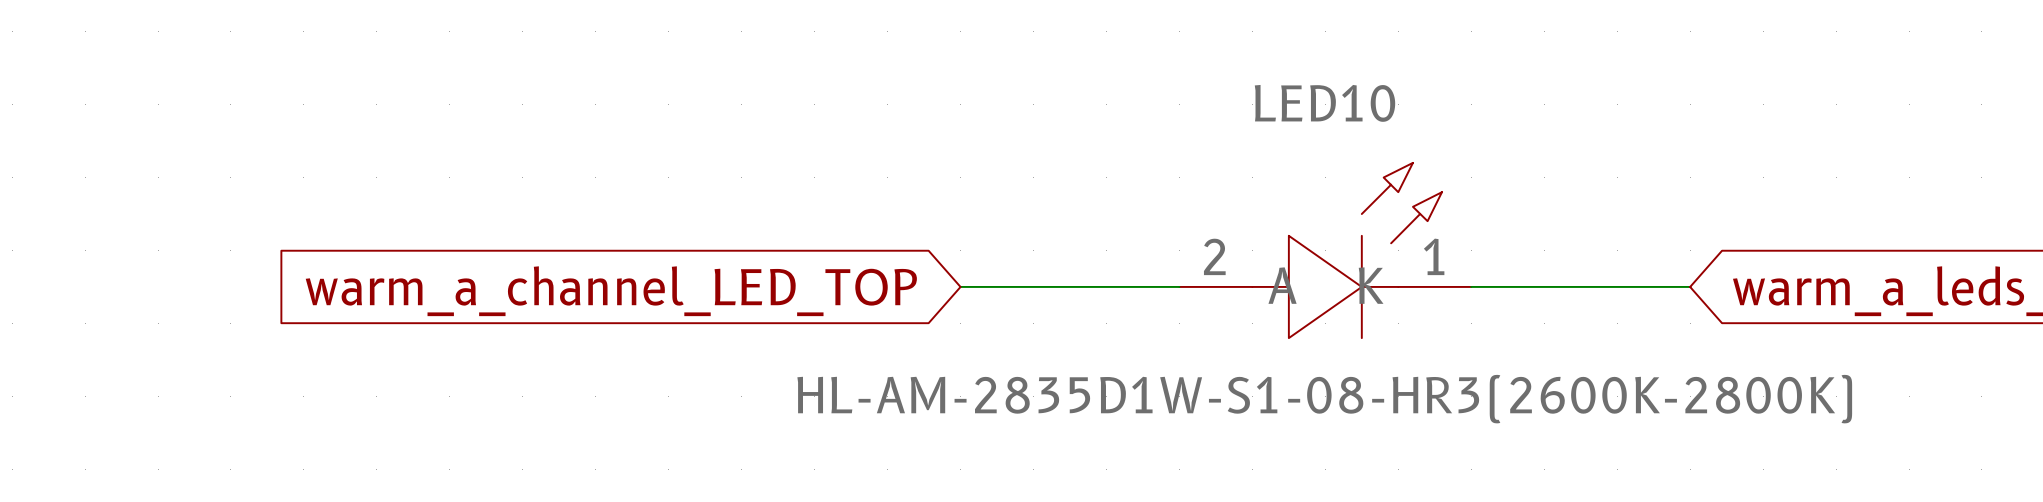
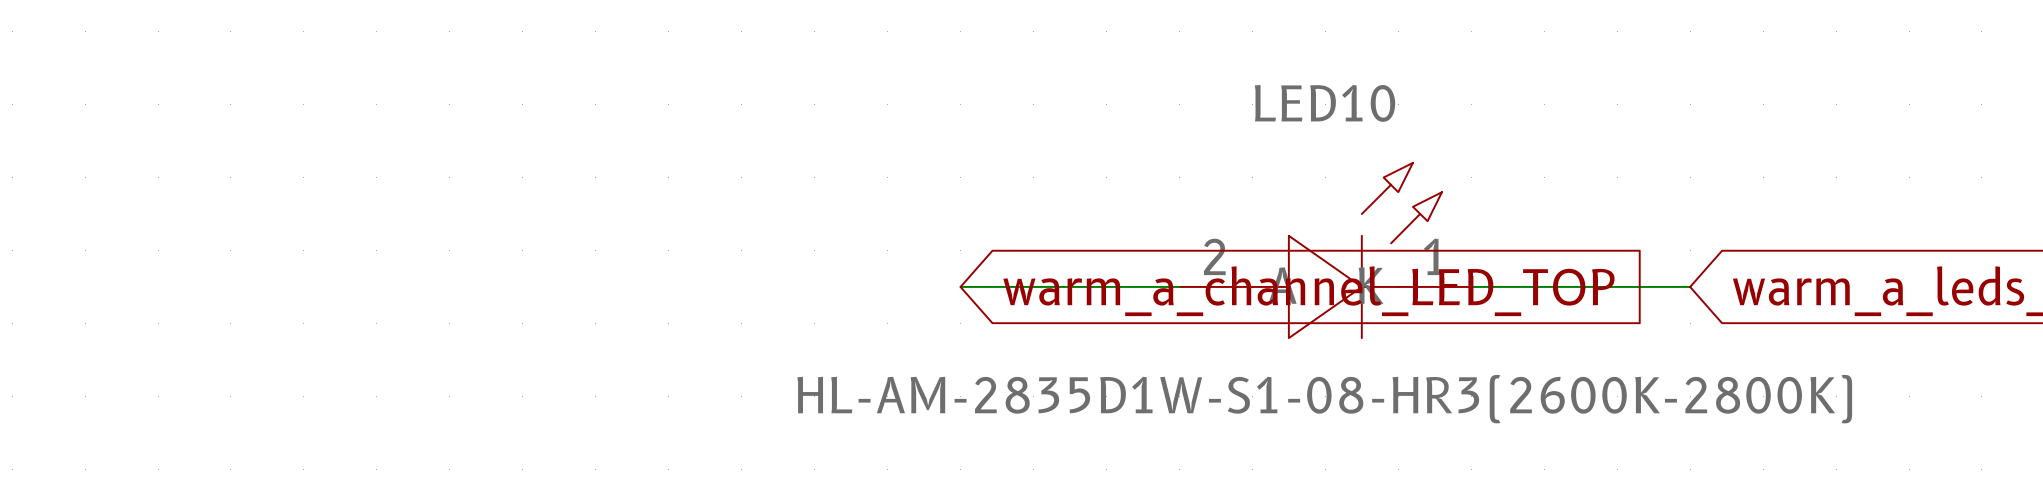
global label rotation: 0° (611, 291) -> 180° (1308, 291)
global label position: warm_a_channel_LED_TOP (611, 291) -> warm_a_channel_LED_TOP (1308, 291)

